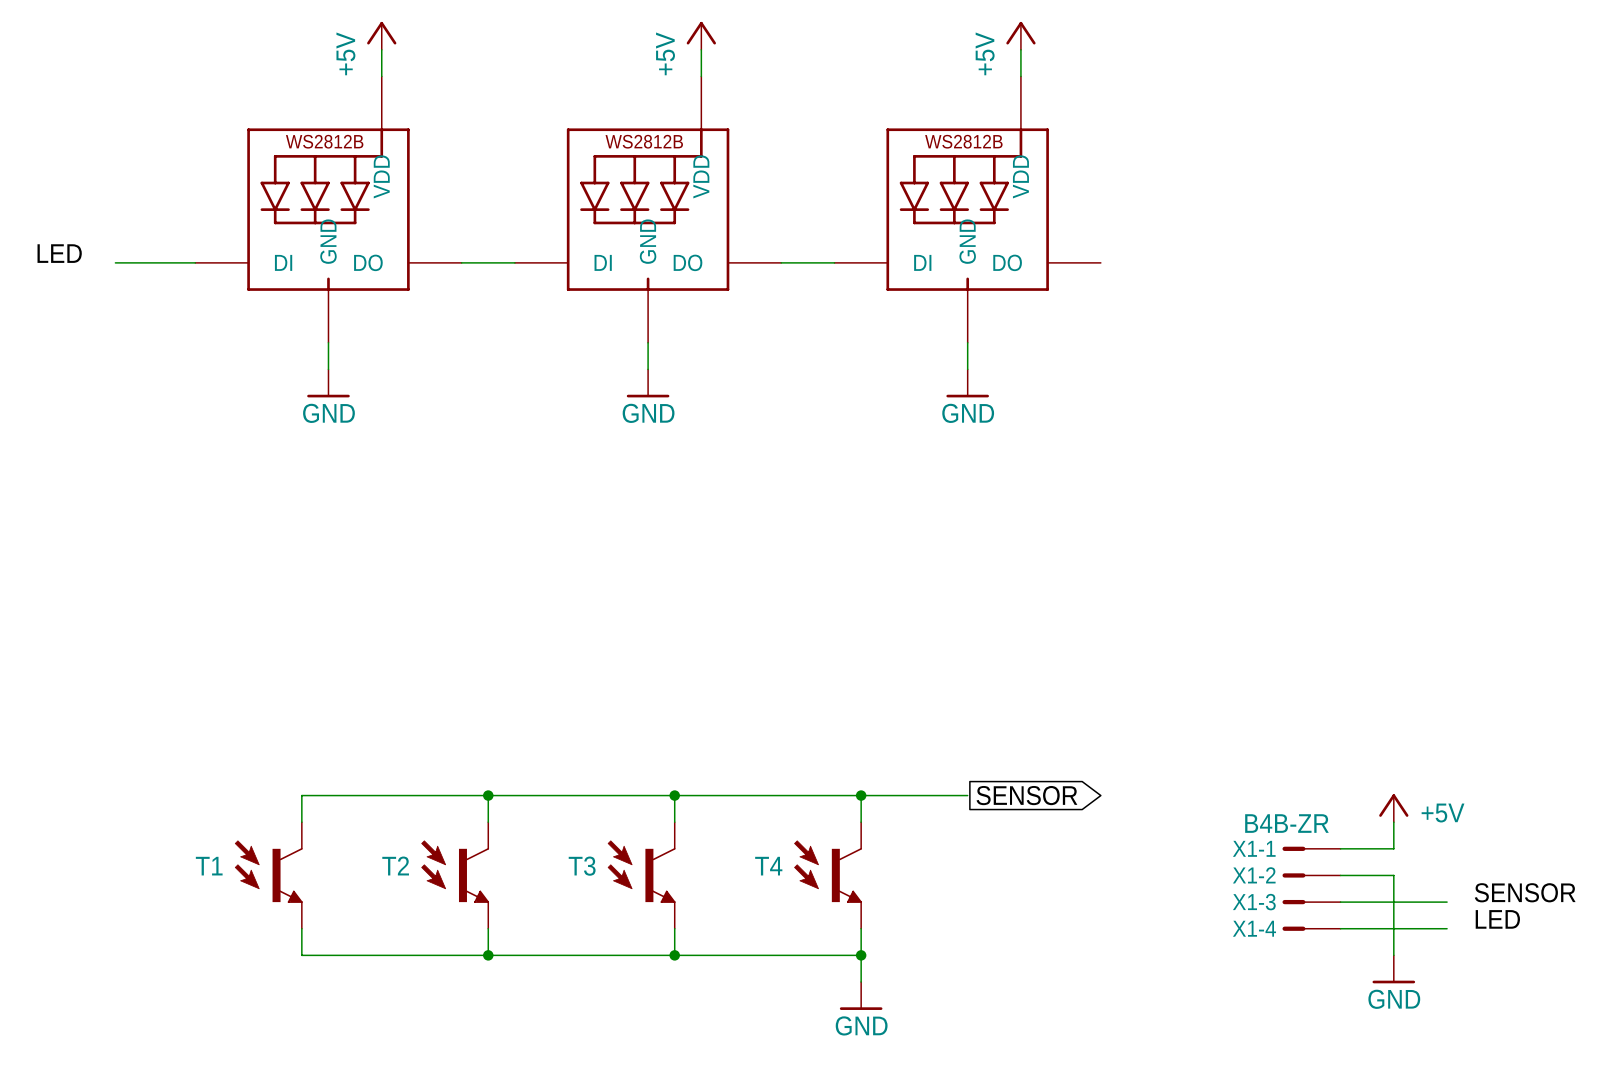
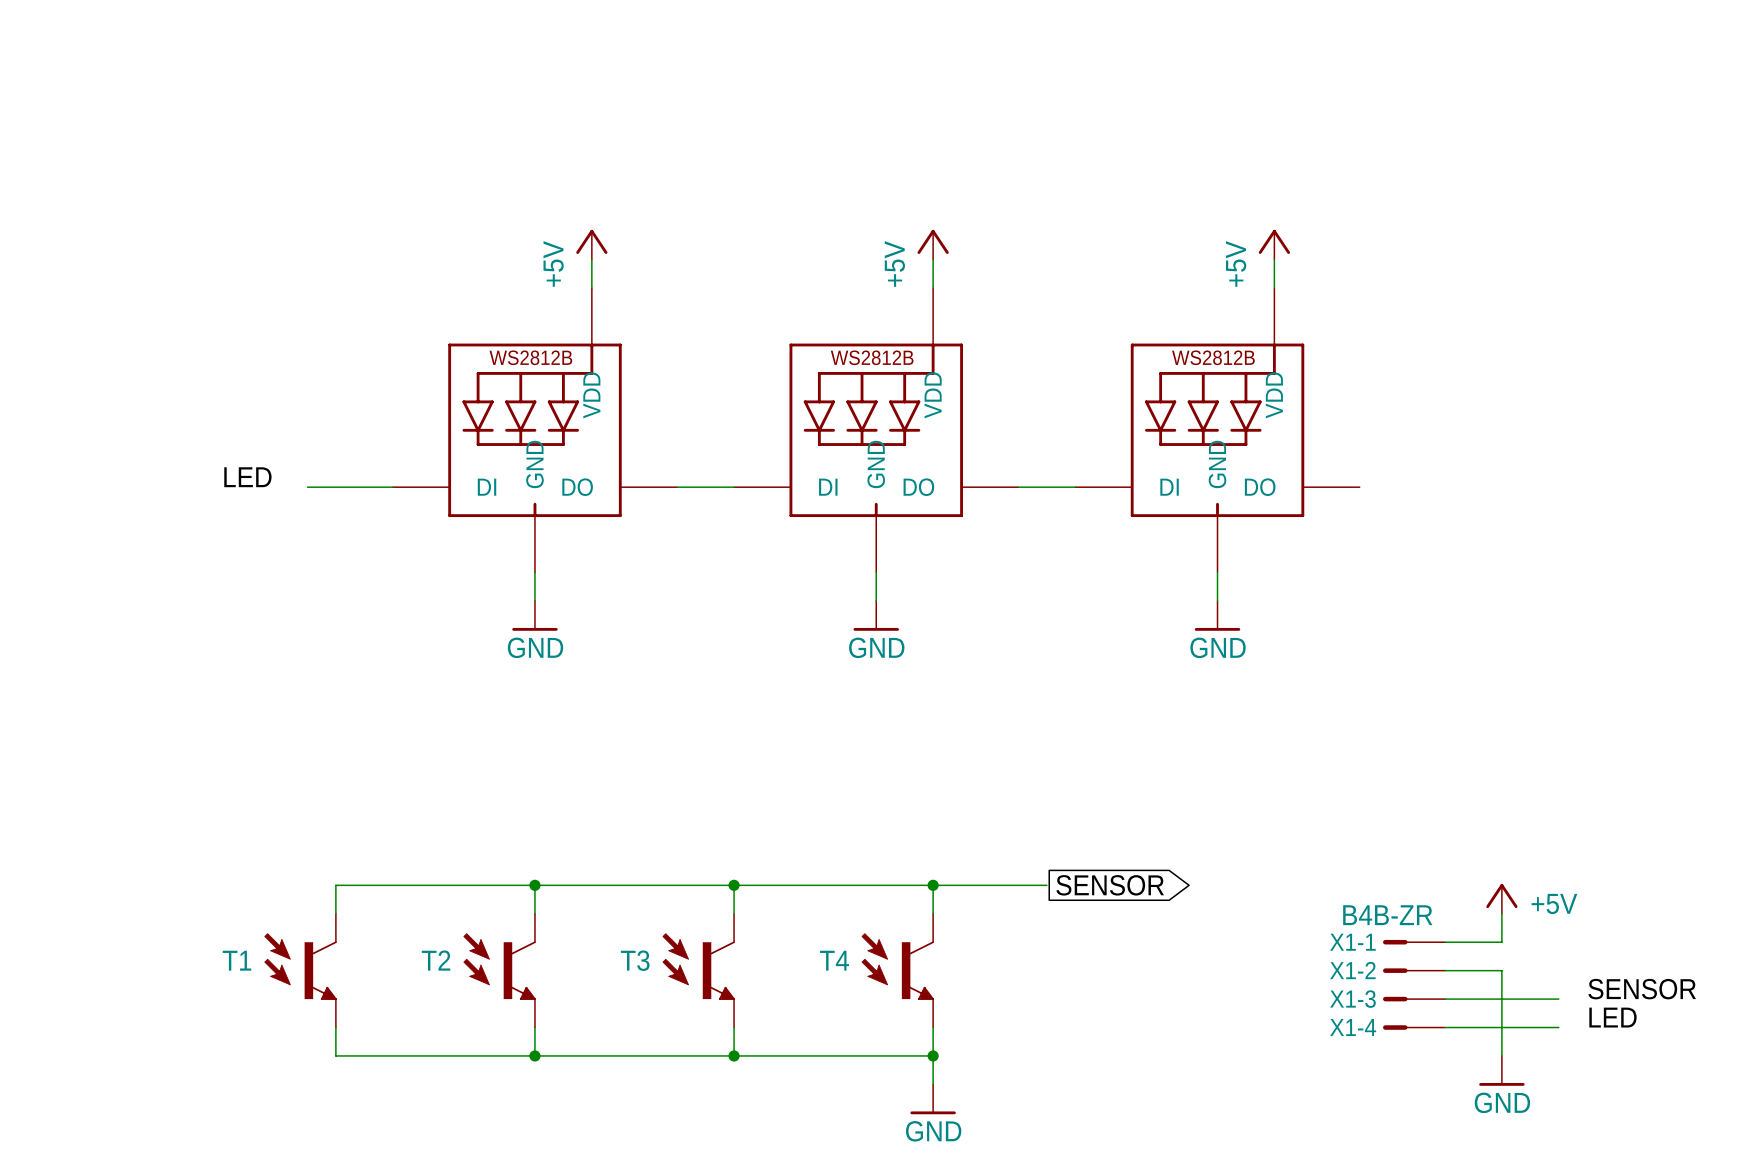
power symbol: +5V (381, 35) -> none
power symbol: +5V (701, 35) -> none
power symbol: +5V (1020, 35) -> none
wire: (381, 49) (381, 76) -> (591, 259) (591, 288)
wire: (701, 49) (701, 76) -> (933, 259) (933, 288)
wire: (1020, 49) (1020, 76) -> (1274, 259) (1274, 288)
power symbol: none -> +5V (591, 244)
power symbol: none -> +5V (933, 244)
power symbol: none -> +5V (1274, 244)
part: (328, 209) -> none
part: (648, 209) -> none
part: (967, 209) -> none
label position: LED (59, 253) -> LED (247, 477)
wire: (115, 262) (195, 262) -> (307, 487) (392, 487)
wire: (461, 262) (514, 262) -> (677, 487) (734, 487)
wire: (781, 262) (834, 262) -> (1018, 487) (1075, 487)
wire: (328, 342) (328, 369) -> (534, 572) (534, 600)
wire: (648, 342) (648, 369) -> (876, 572) (876, 600)
wire: (967, 342) (967, 369) -> (1217, 572) (1217, 600)
part: none -> (534, 430)
part: none -> (876, 430)
part: none -> (1217, 430)
power symbol: GND (328, 383) -> none
power symbol: GND (648, 383) -> none
power symbol: GND (967, 383) -> none
power symbol: none -> GND (534, 615)
power symbol: none -> GND (876, 615)
power symbol: none -> GND (1217, 615)

